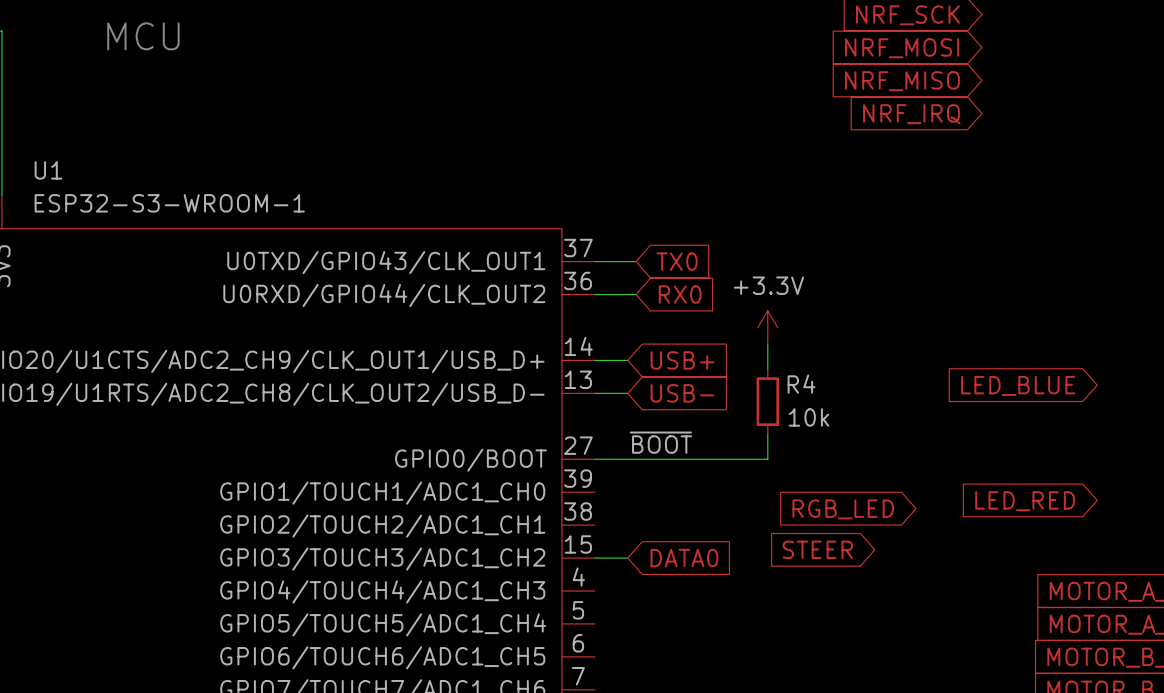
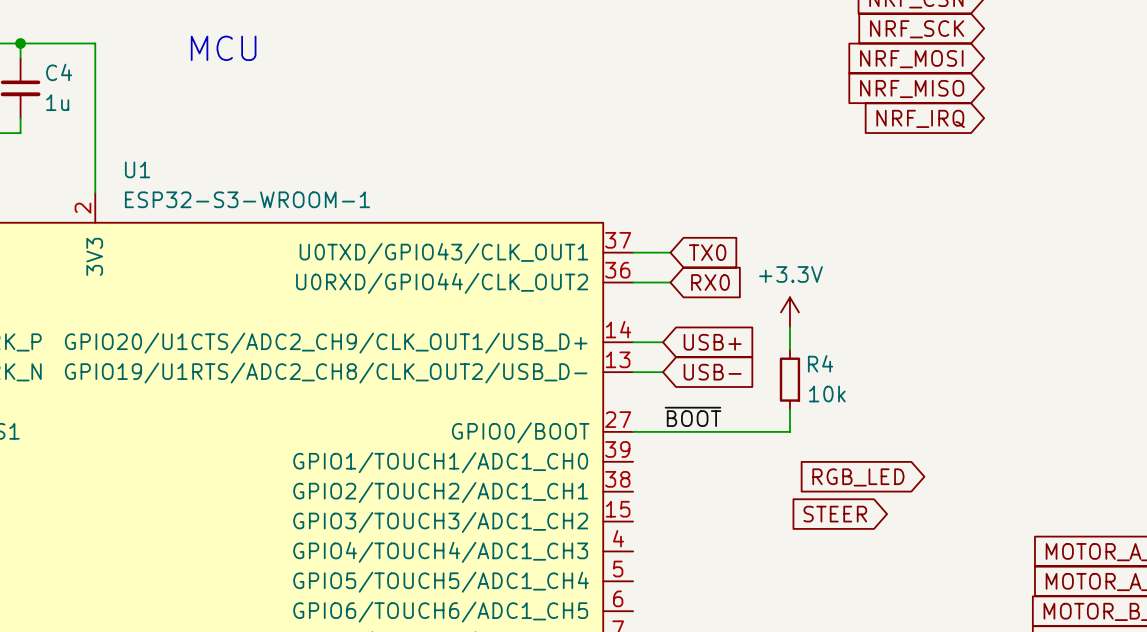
global label: LED_BLUE (1018, 385) -> none
global label: LED_RED (1025, 501) -> none
wire: (594, 558) (627, 558) -> none
global label: DATA0 (684, 558) -> none

